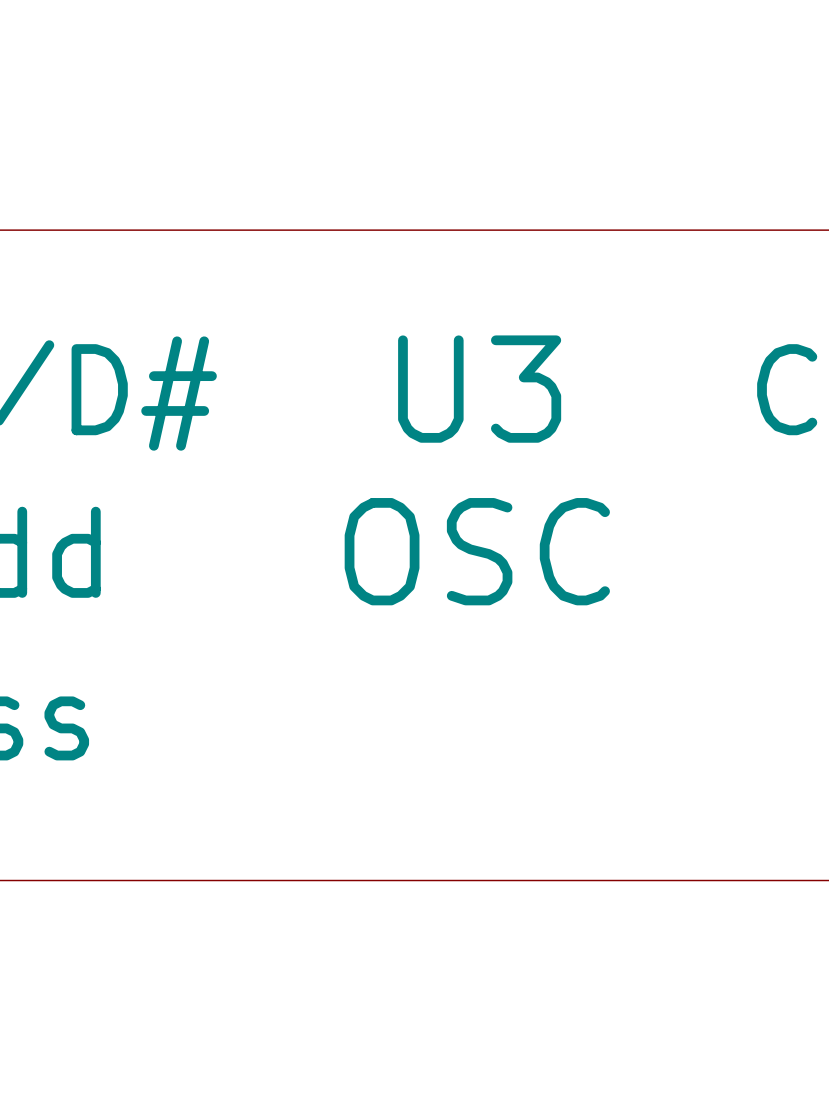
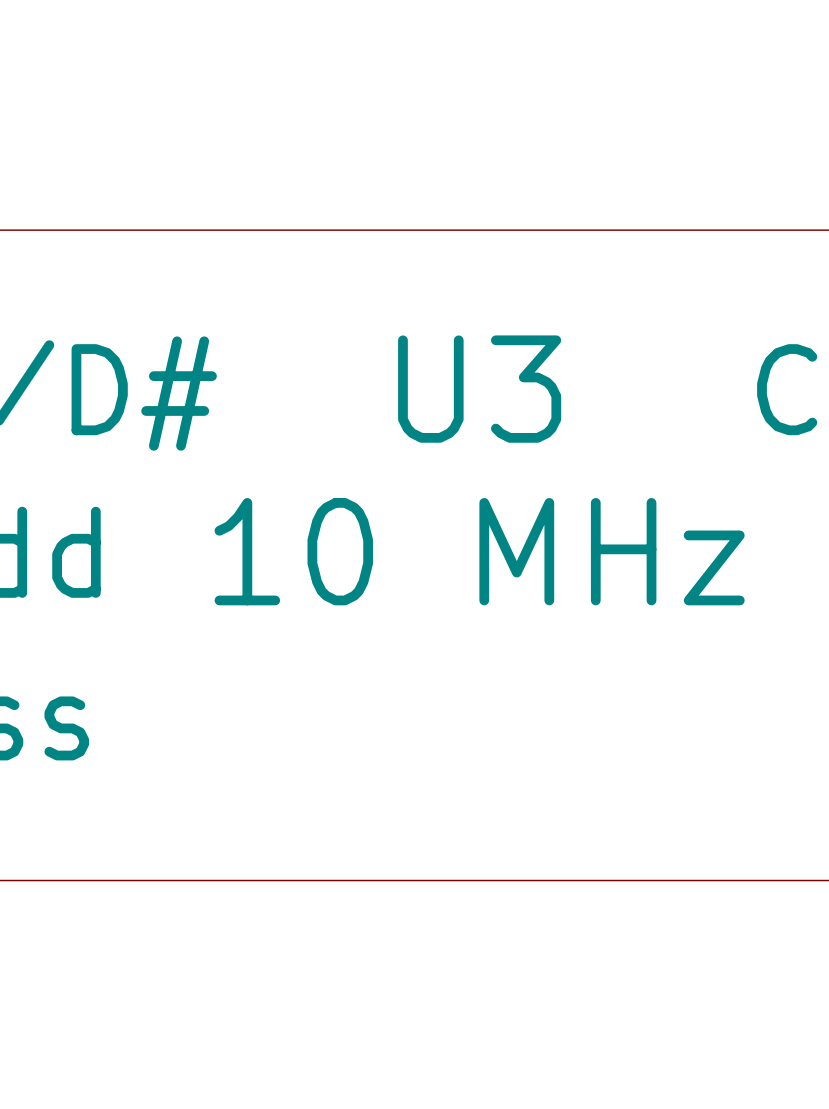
U3 value: OSC (477, 551) -> 10 MHz (479, 551)

